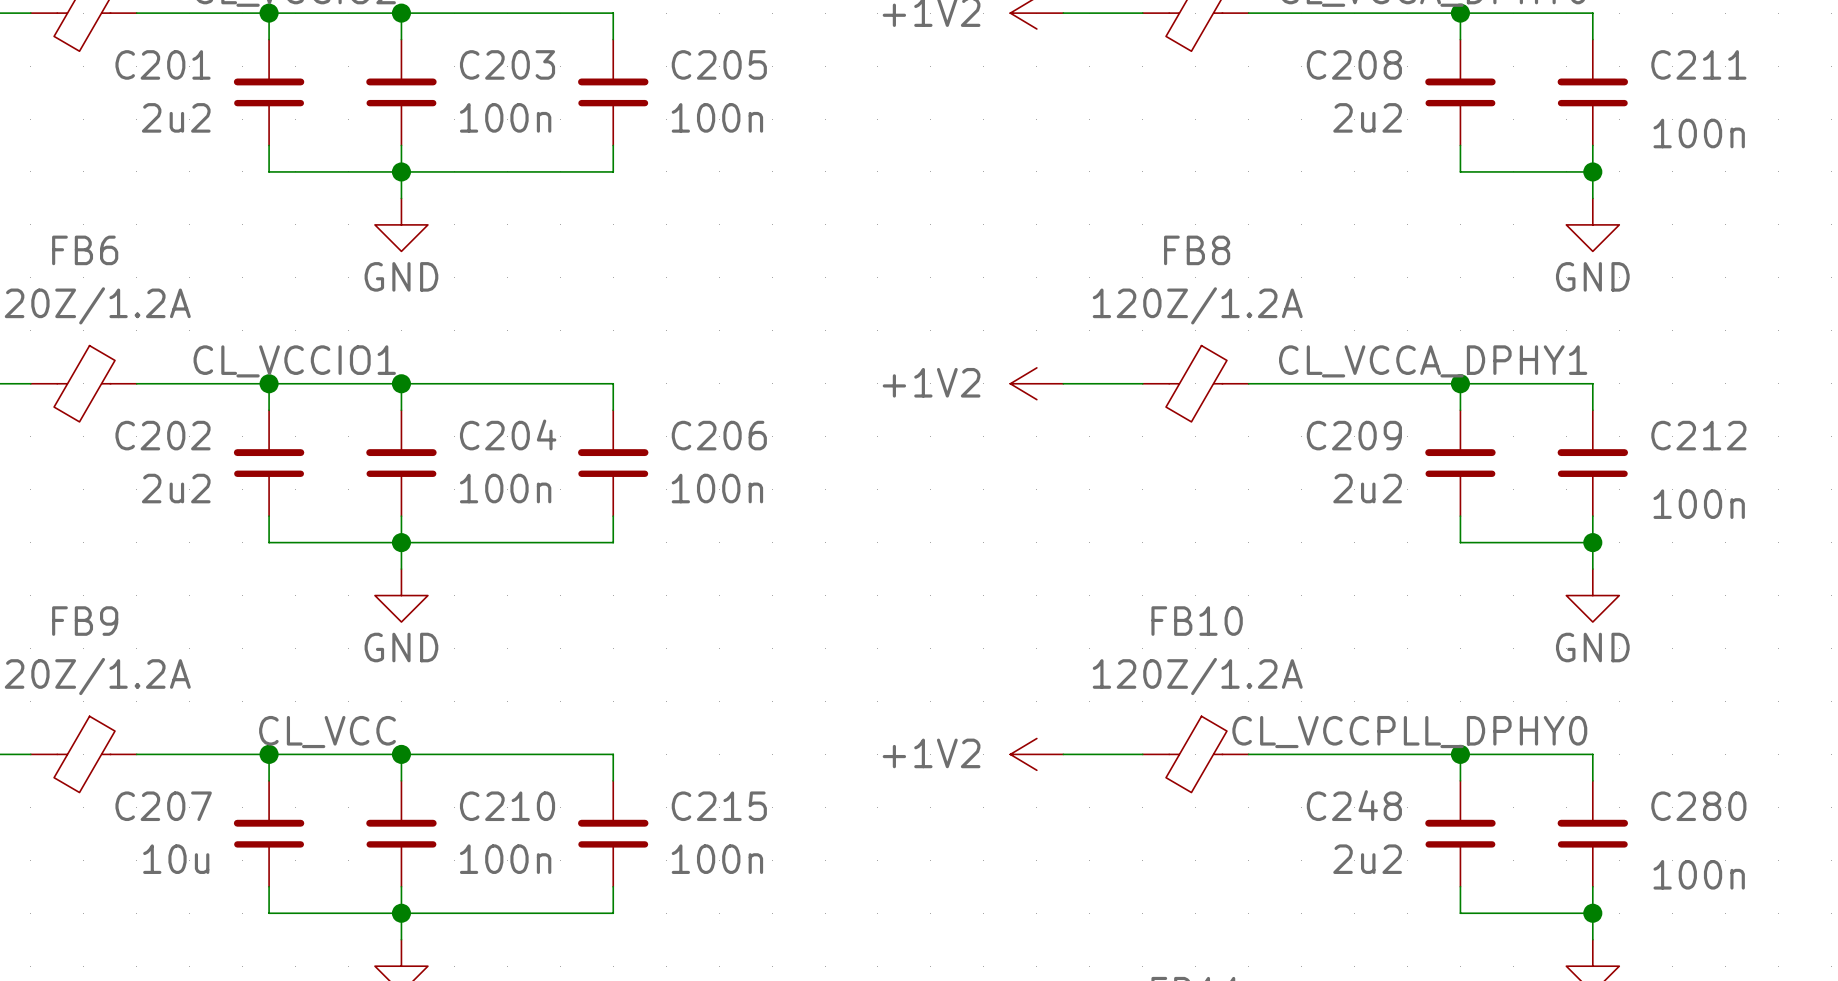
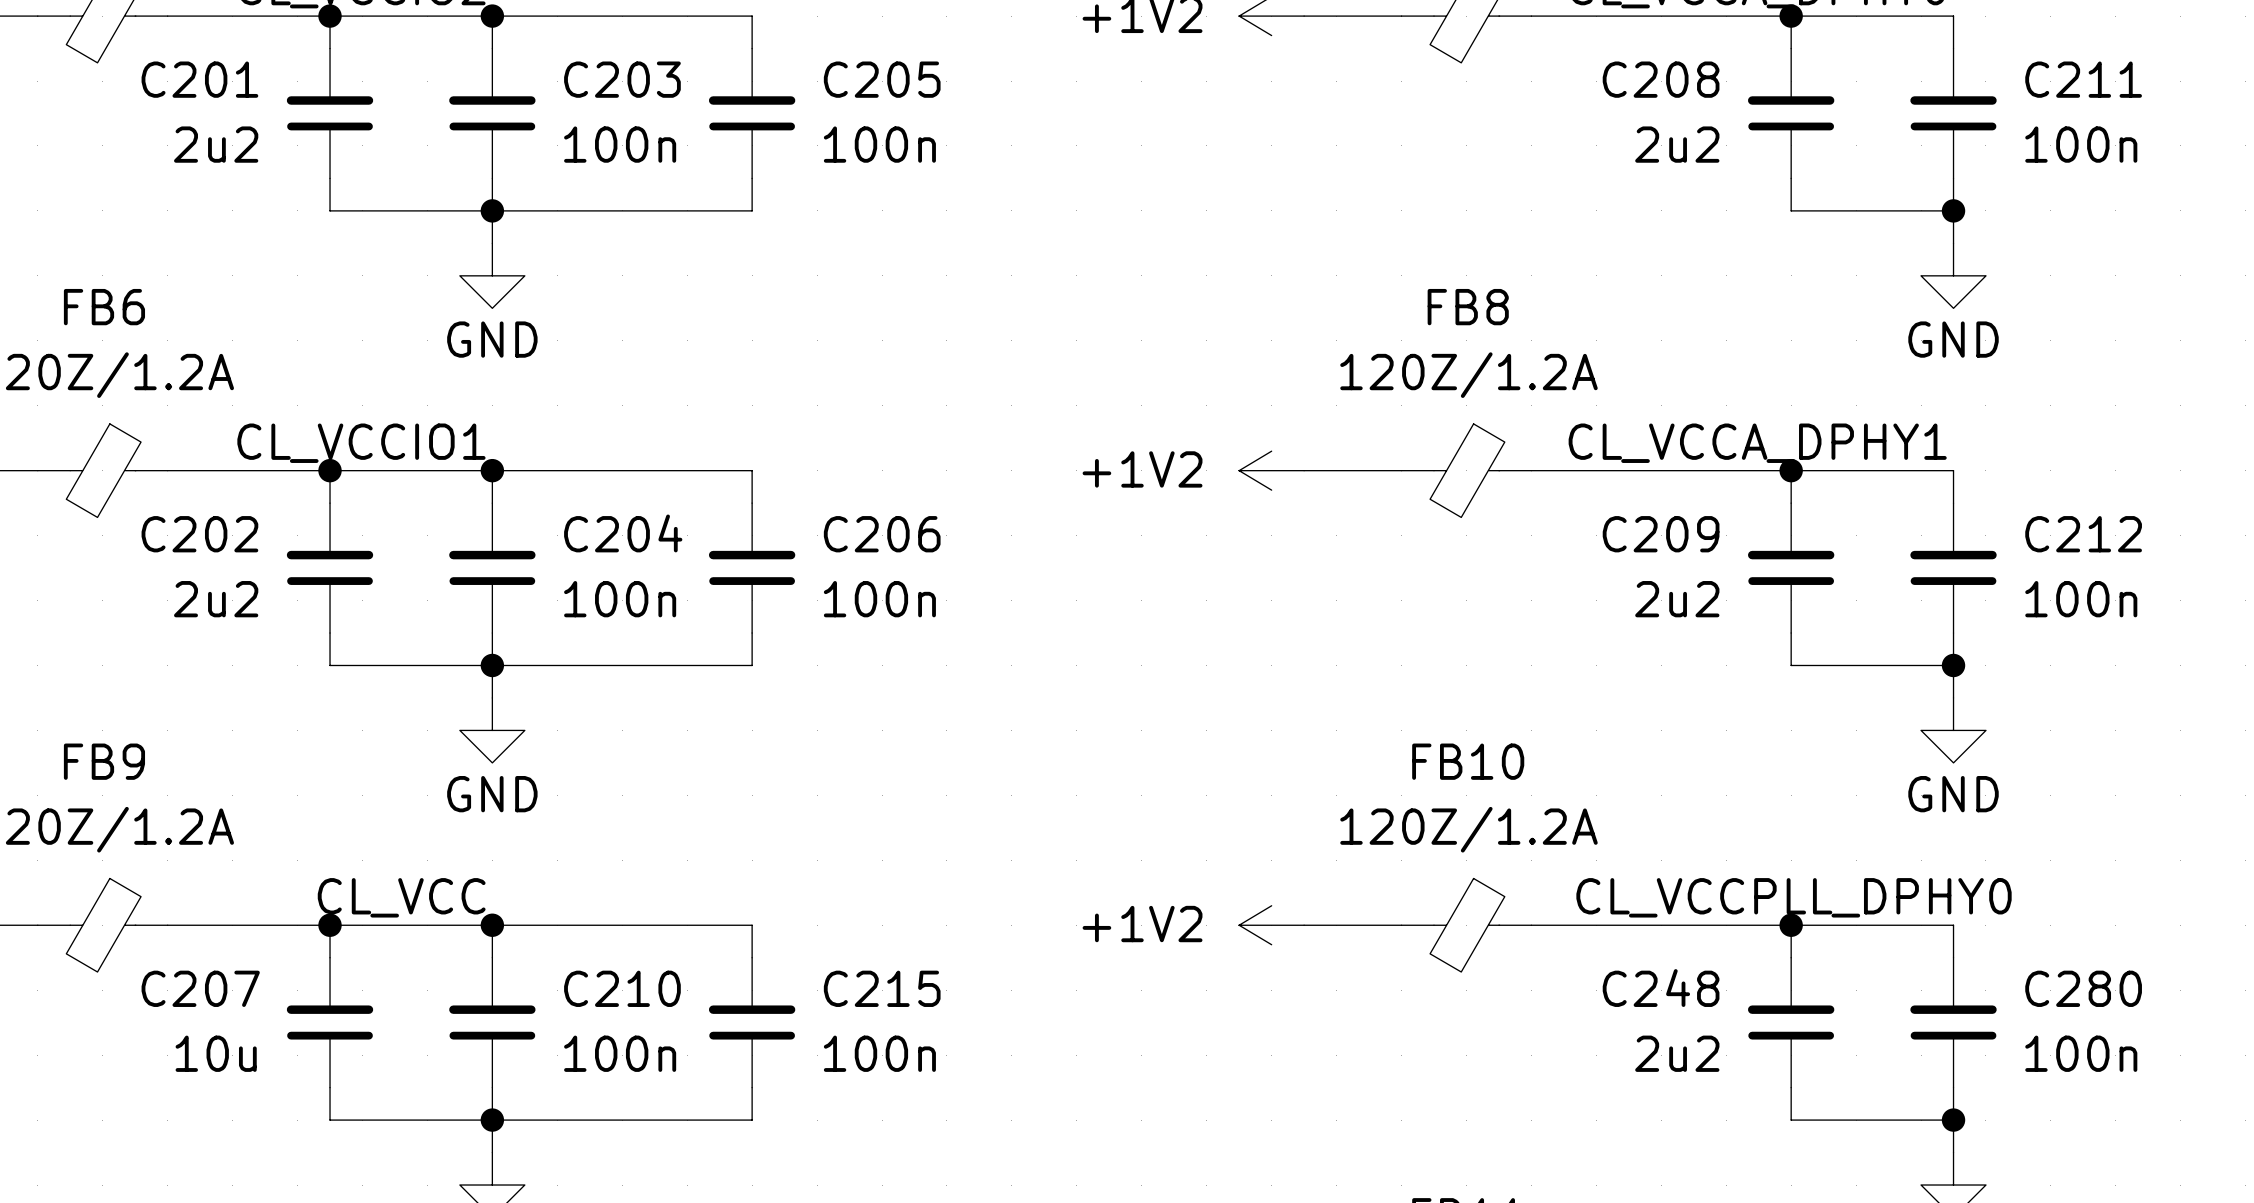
C211 text position: 100n (1699, 133) -> 100n (2081, 144)
C212 text position: 100n (1699, 504) -> 100n (2081, 599)
label position: CL_VCCPLL_DPHY0 (1409, 732) -> CL_VCCPLL_DPHY0 (1794, 897)
C280 text position: 100n (1699, 874) -> 100n (2081, 1053)

